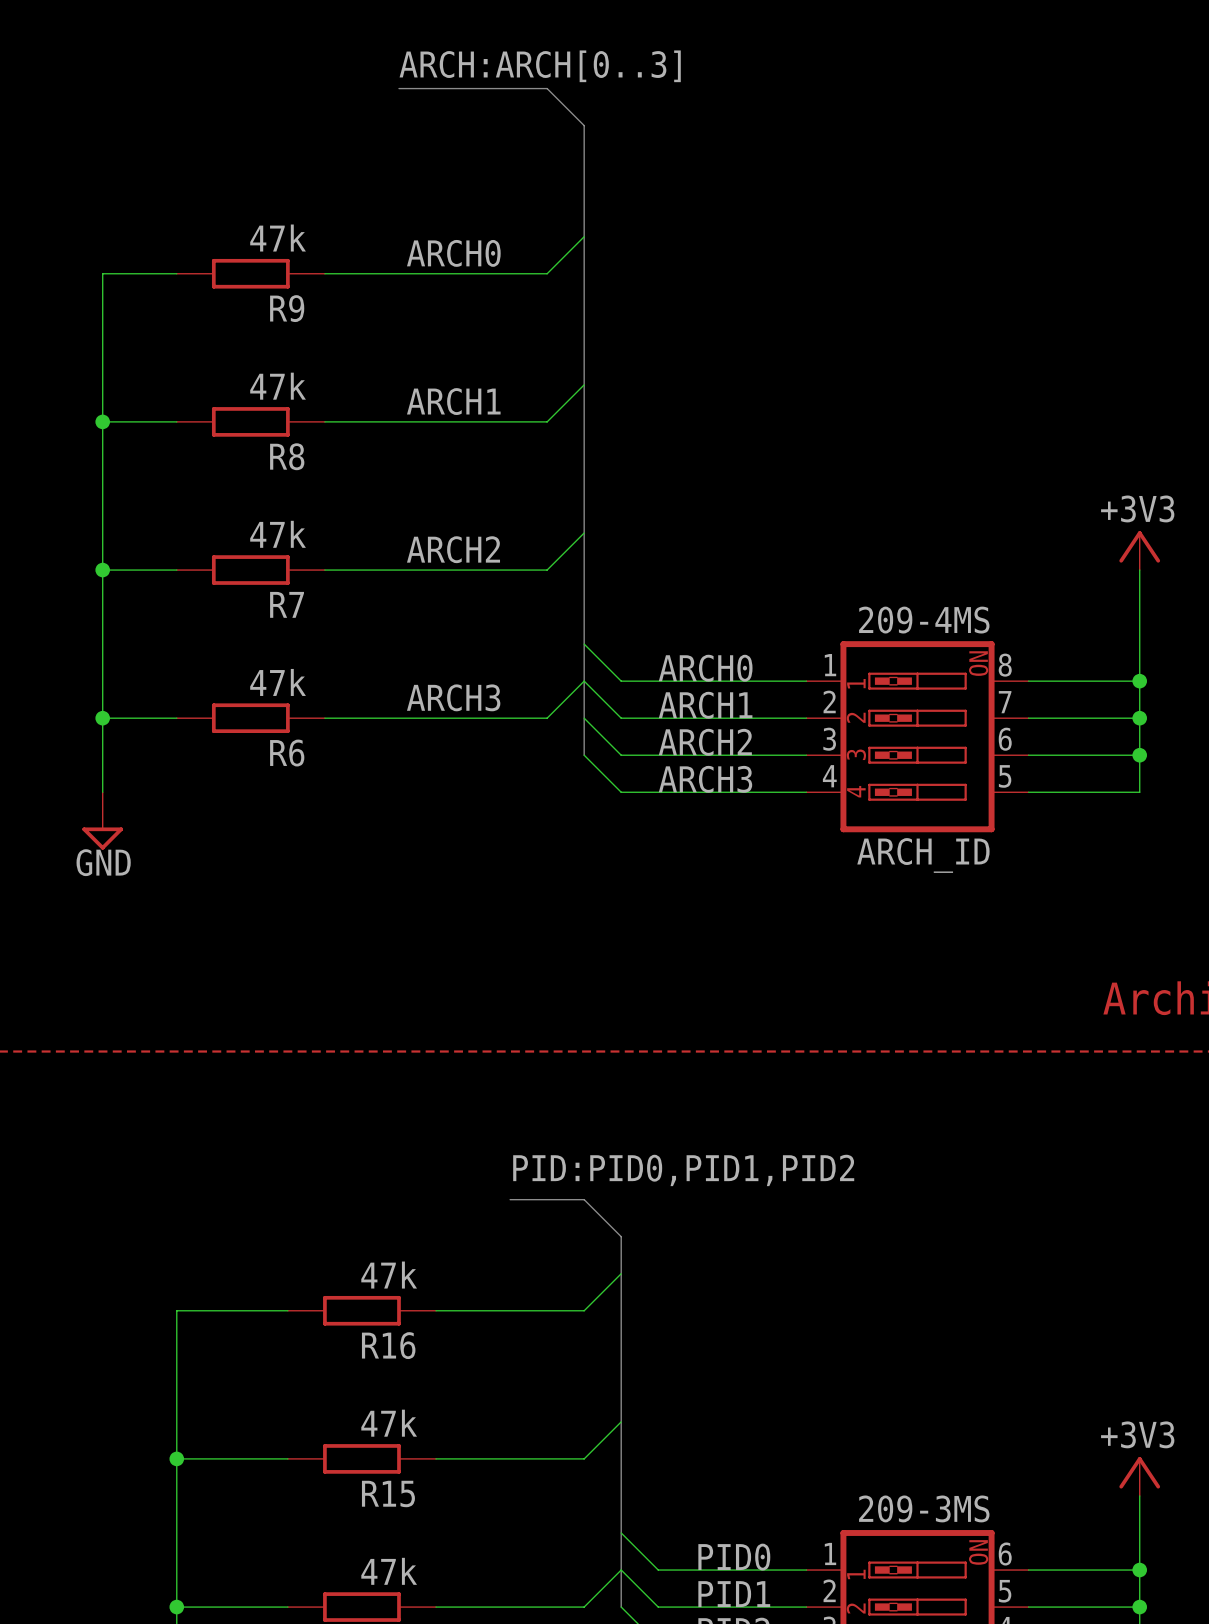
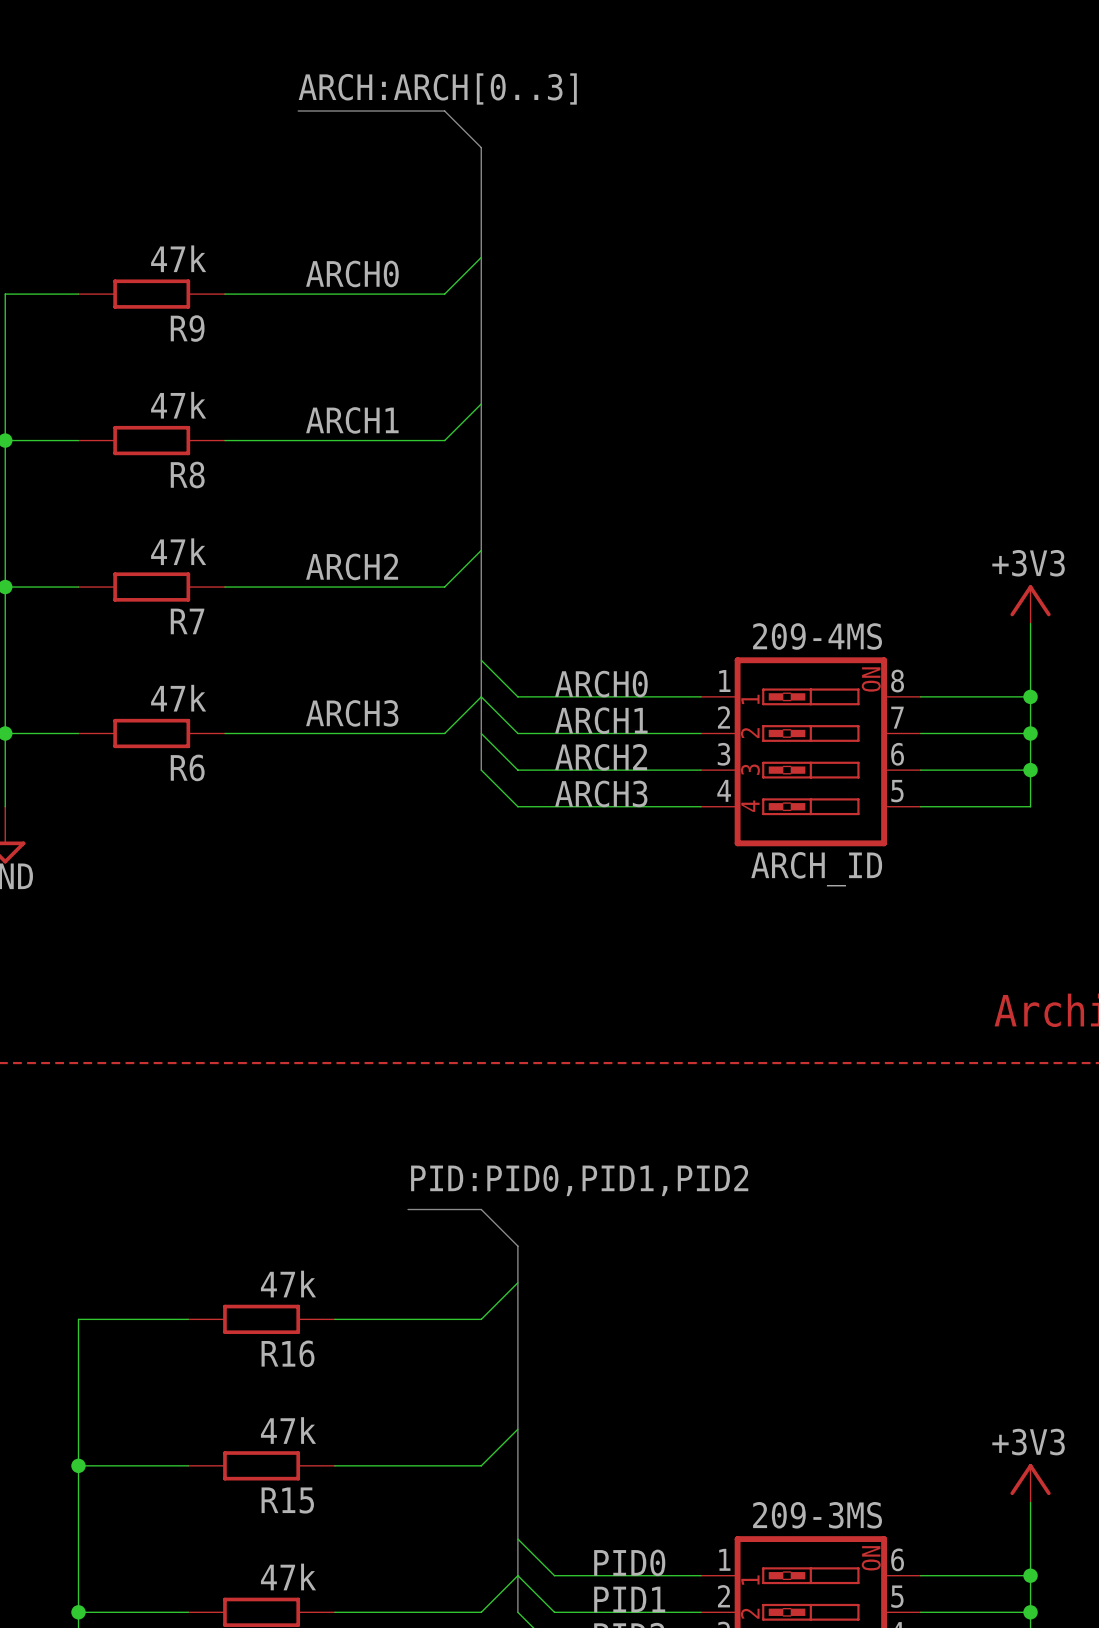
power symbol position: +3V3 (1139, 550) -> +3V3 (1030, 604)

